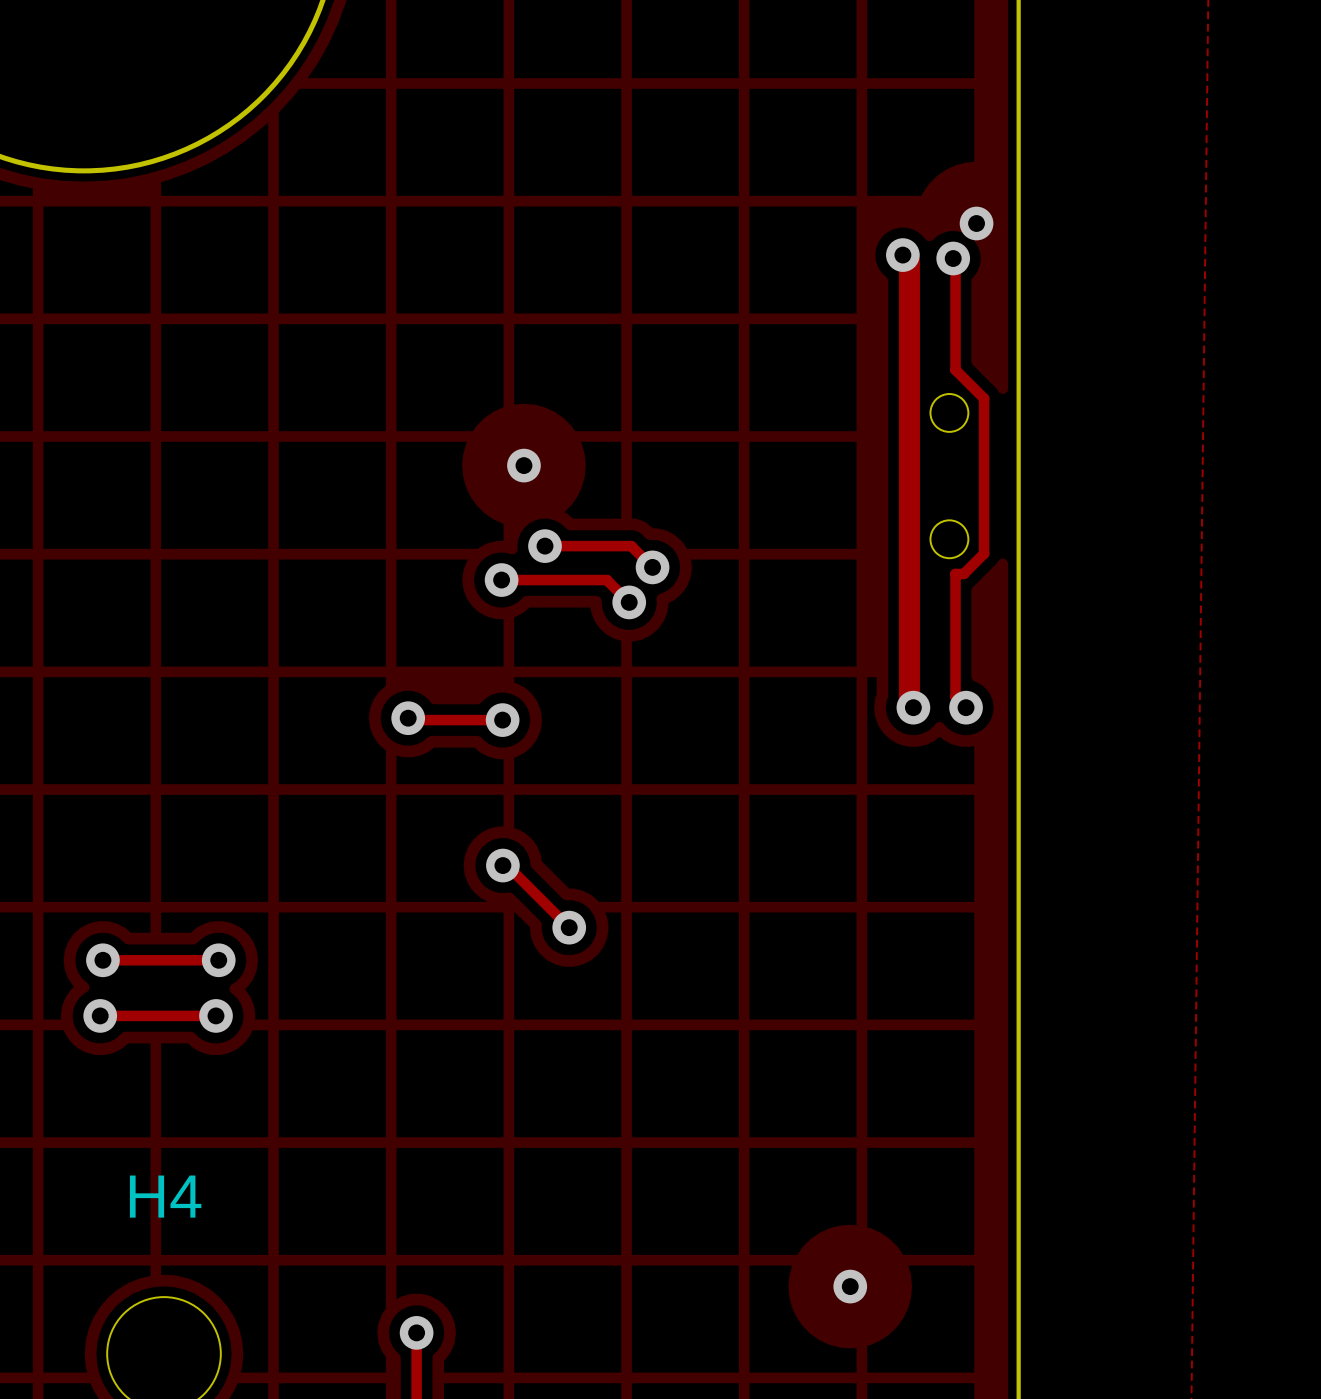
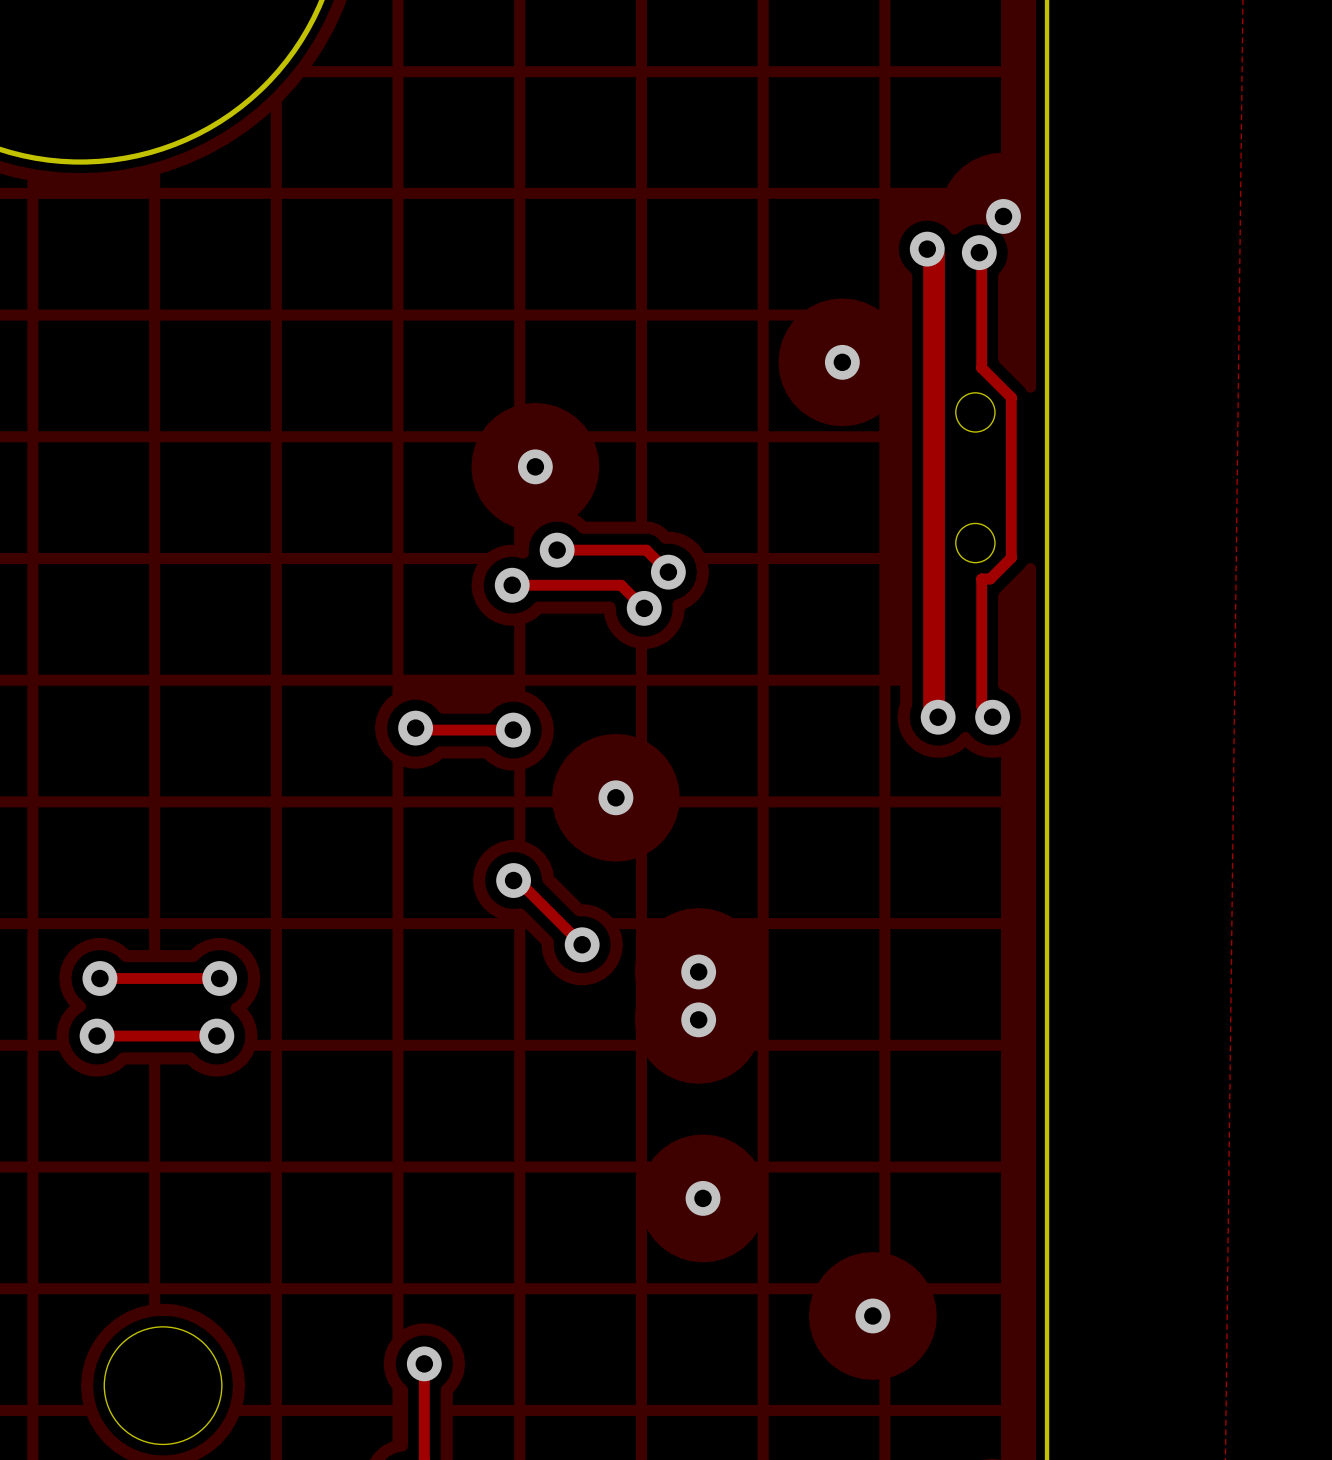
via: none -> (842, 362)
via: none -> (615, 797)
via: none -> (698, 971)
via: none -> (698, 1019)
via: none -> (703, 1198)
H4 name: H4 (165, 1196) -> none

